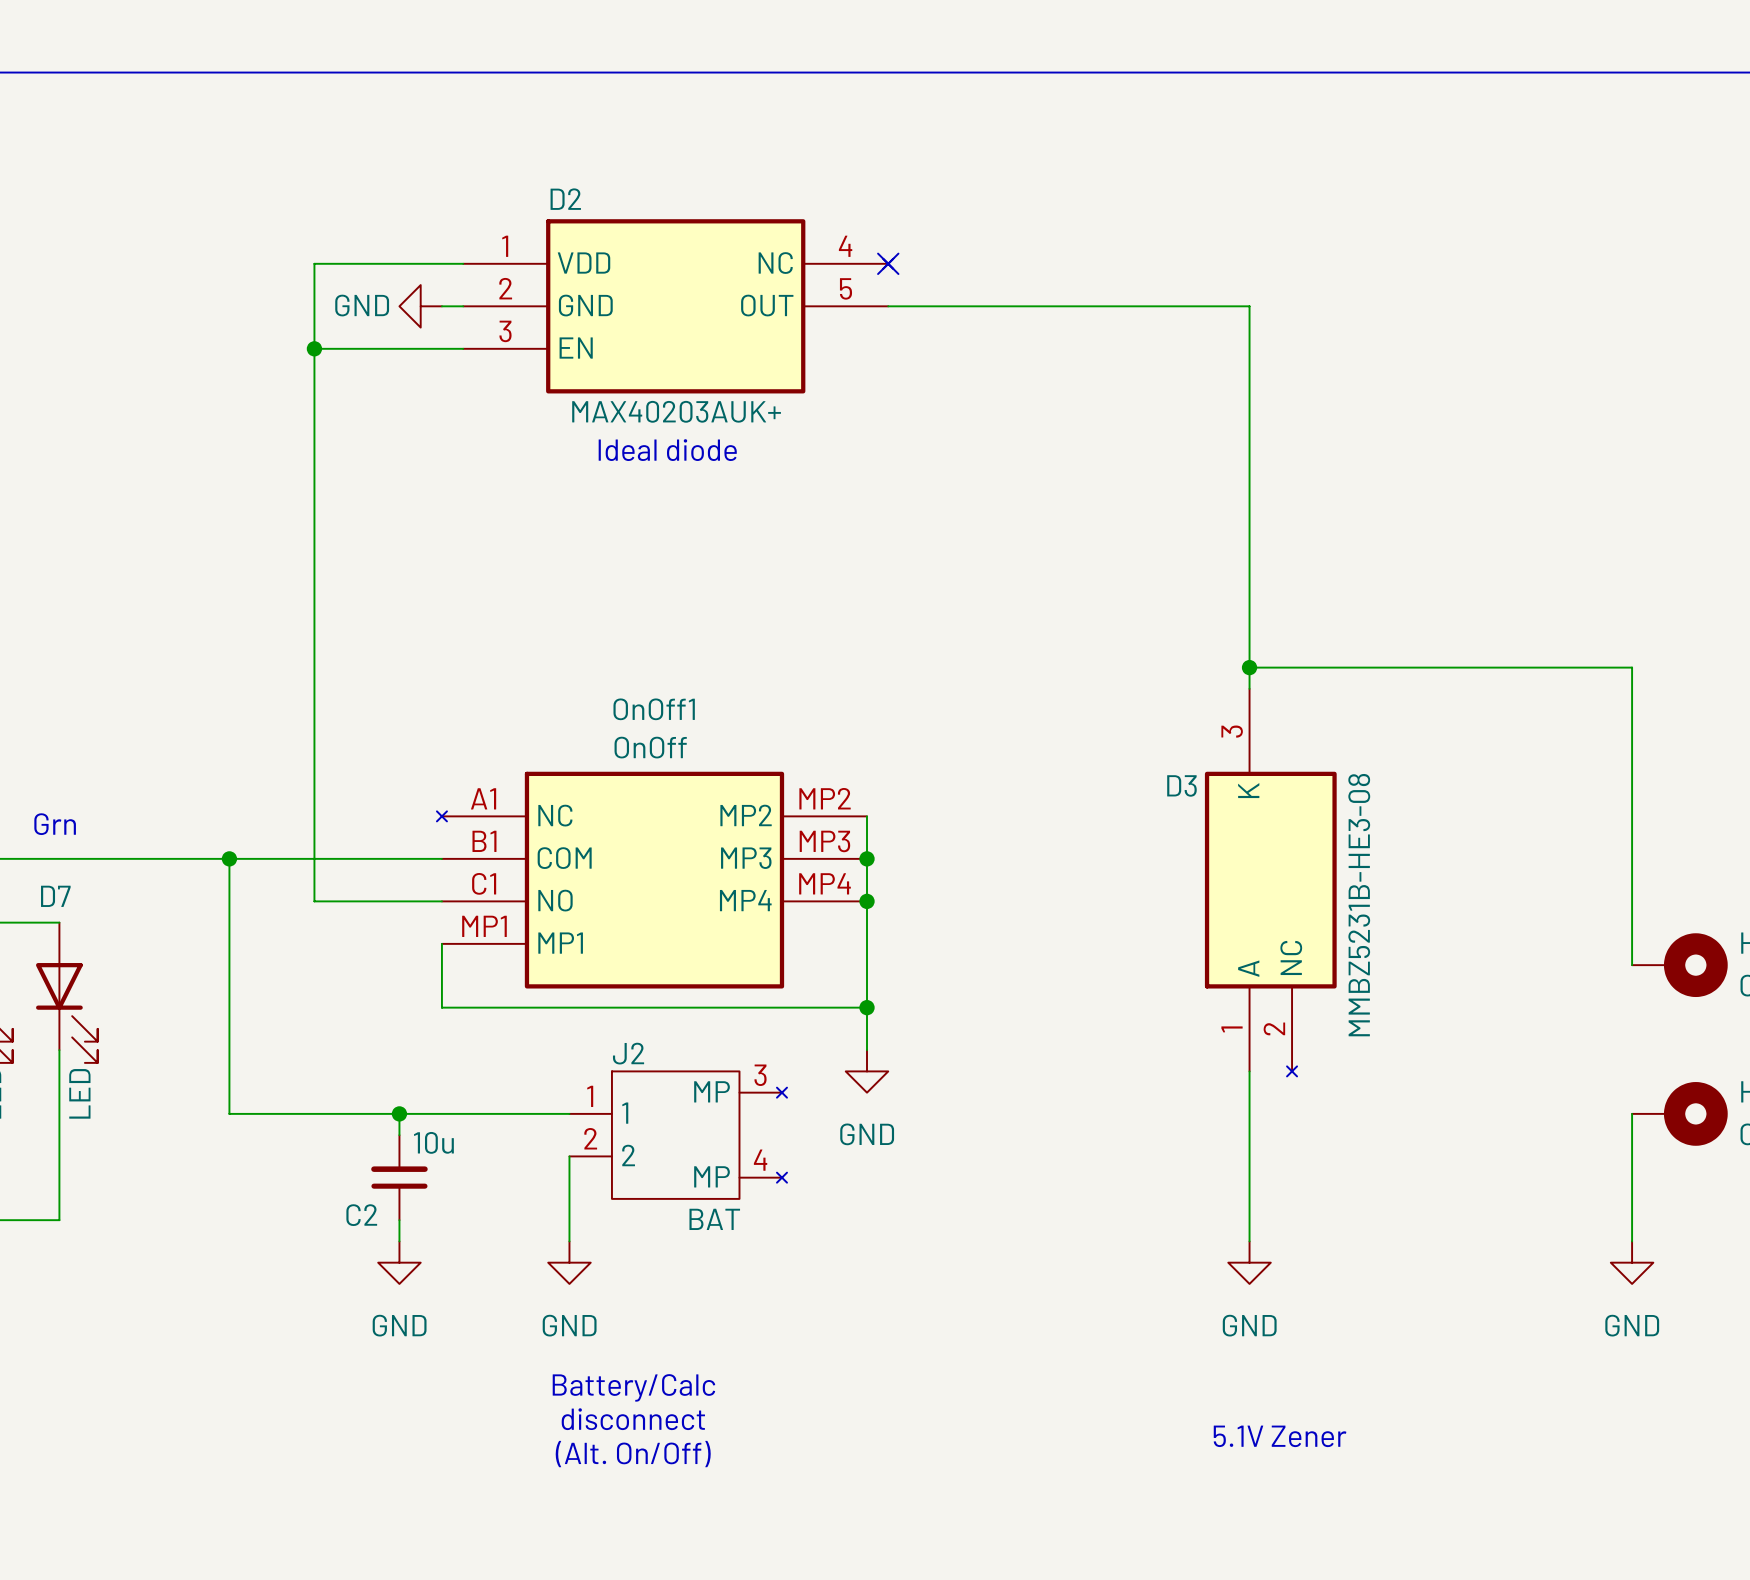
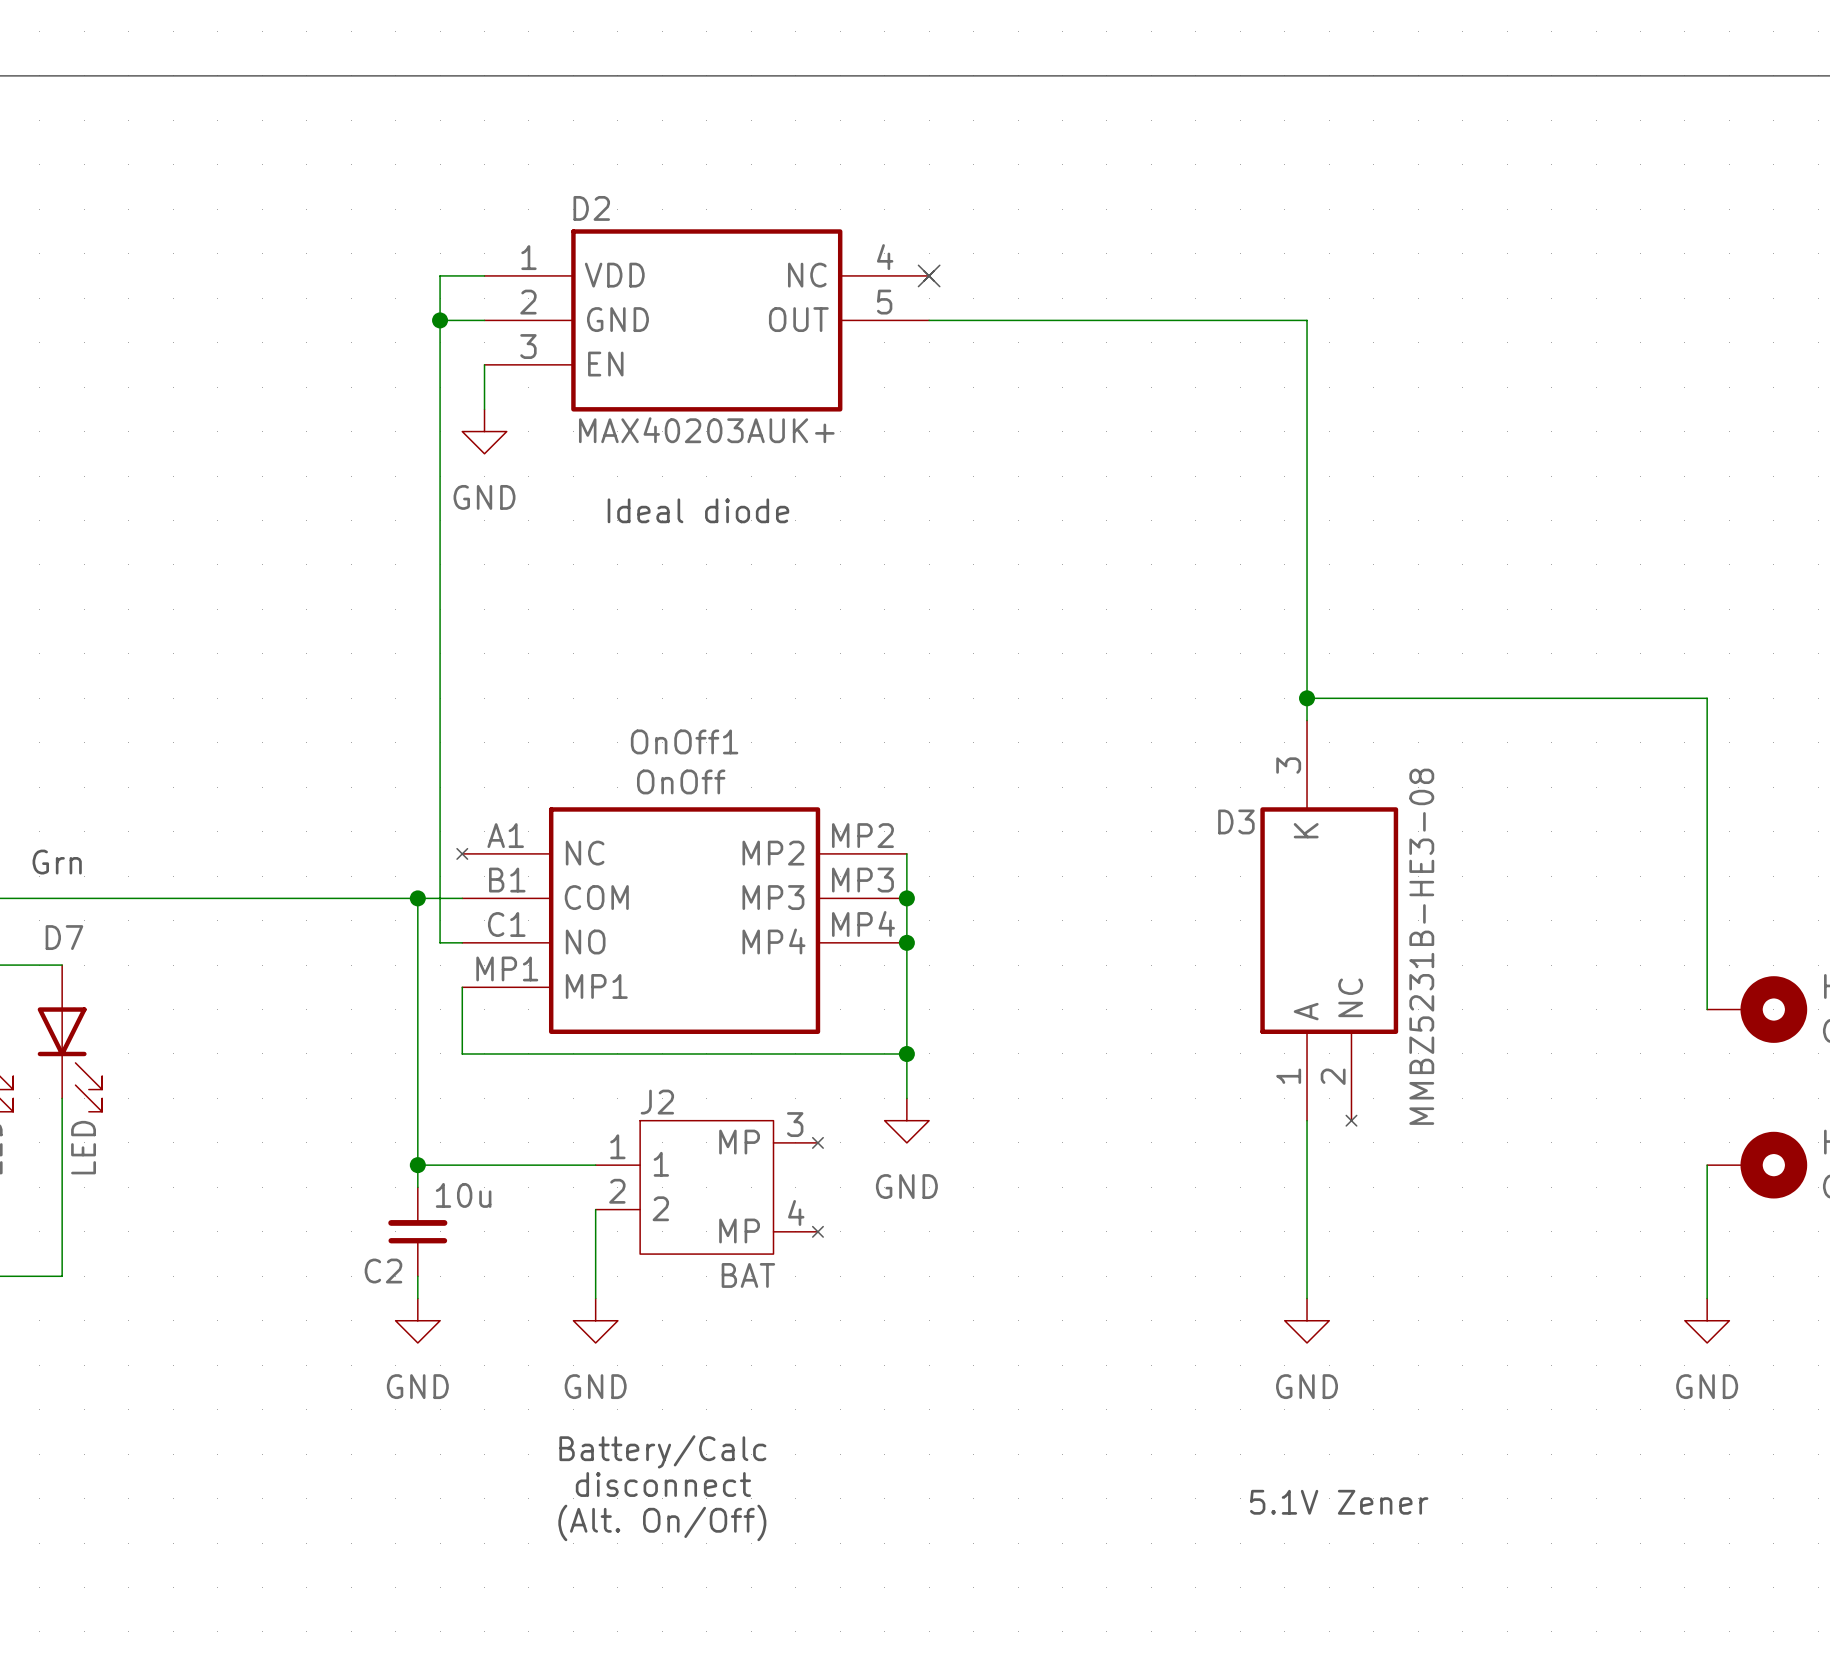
wire: (420, 263) (314, 263) (314, 901) (420, 901) -> (440, 275) (440, 942)
junction: none -> (440, 320)
power symbol rotation: 0° (420, 306) -> 90° counterclockwise (484, 431)
power symbol position: GND (420, 306) -> GND (484, 431)
wire: (314, 348) (463, 348) -> (484, 409) (484, 364)
junction: (314, 348) -> none
text position: Ideal diode (667, 450) -> Ideal diode (698, 510)
wire: (229, 858) (229, 1113) (399, 1113) -> (417, 898) (417, 1165)
junction: (229, 858) -> none
junction: none -> (417, 898)

